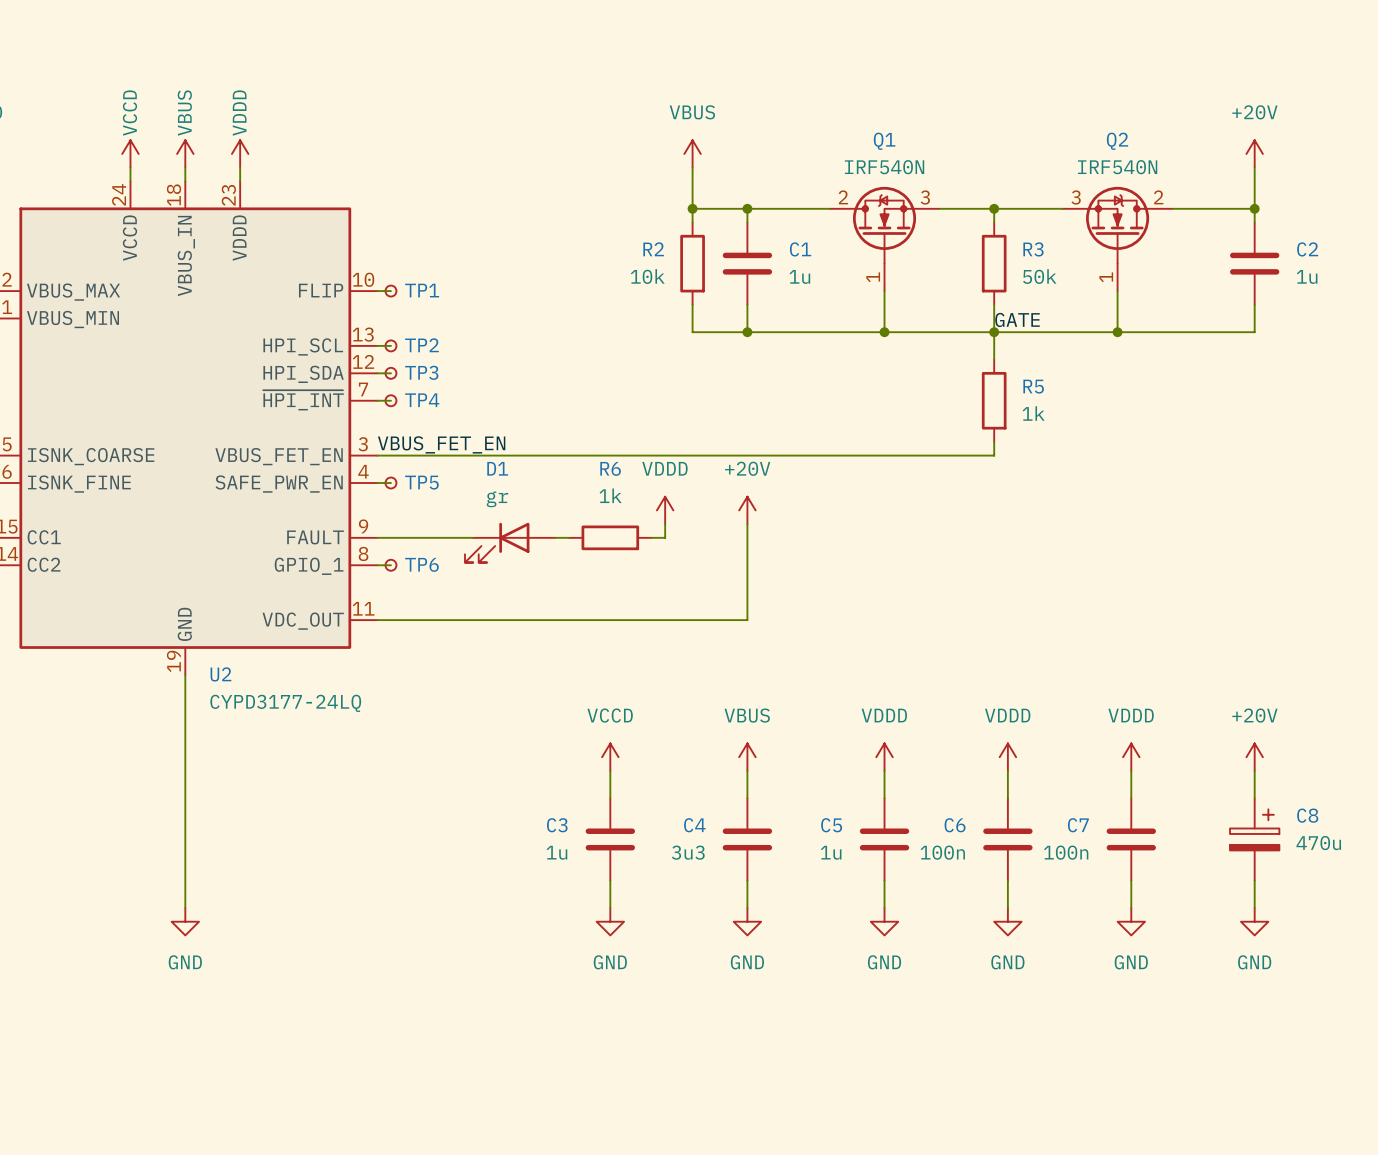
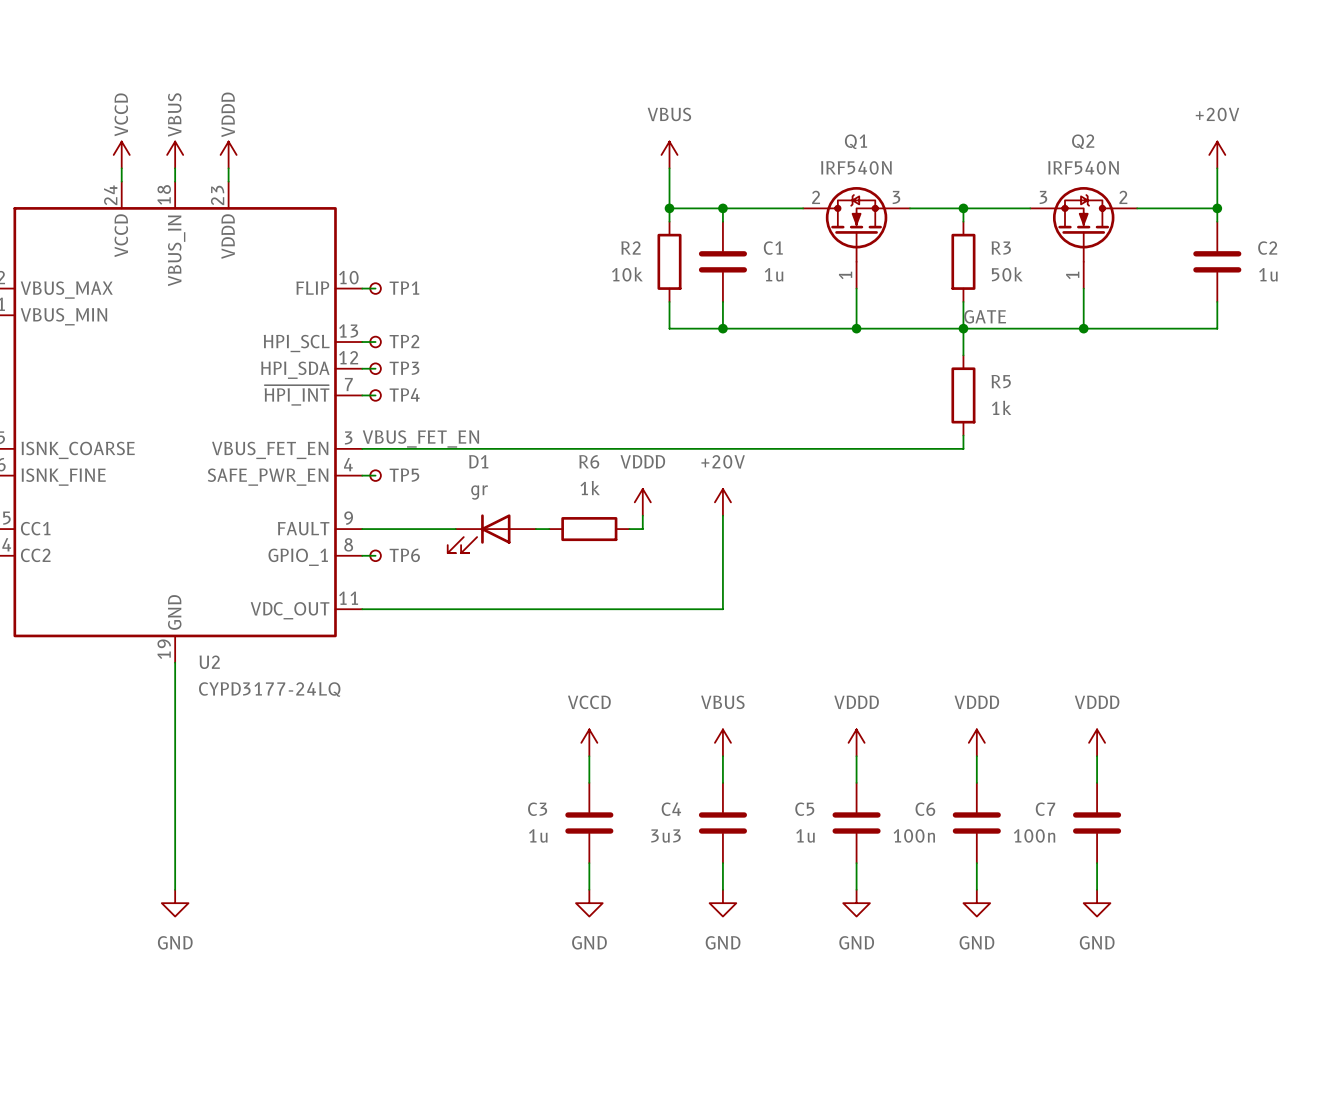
power symbol: +20V (1254, 757) -> none
wire: (1254, 770) (1254, 798) -> none
C8: 470u (1254, 839) -> none
wire: (1254, 880) (1254, 908) -> none
power symbol: GND (1254, 921) -> none

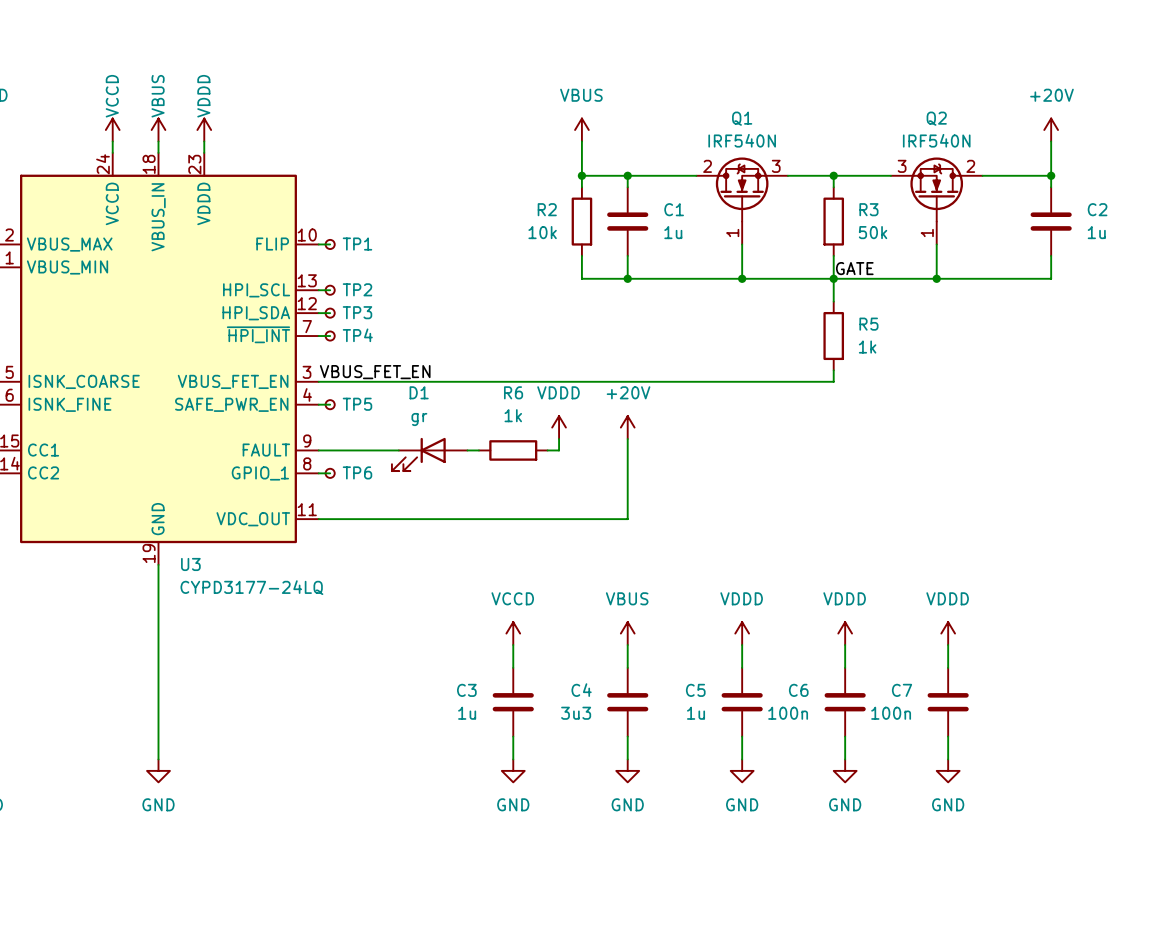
U2 name: U2 (209, 662) -> U3 (190, 564)

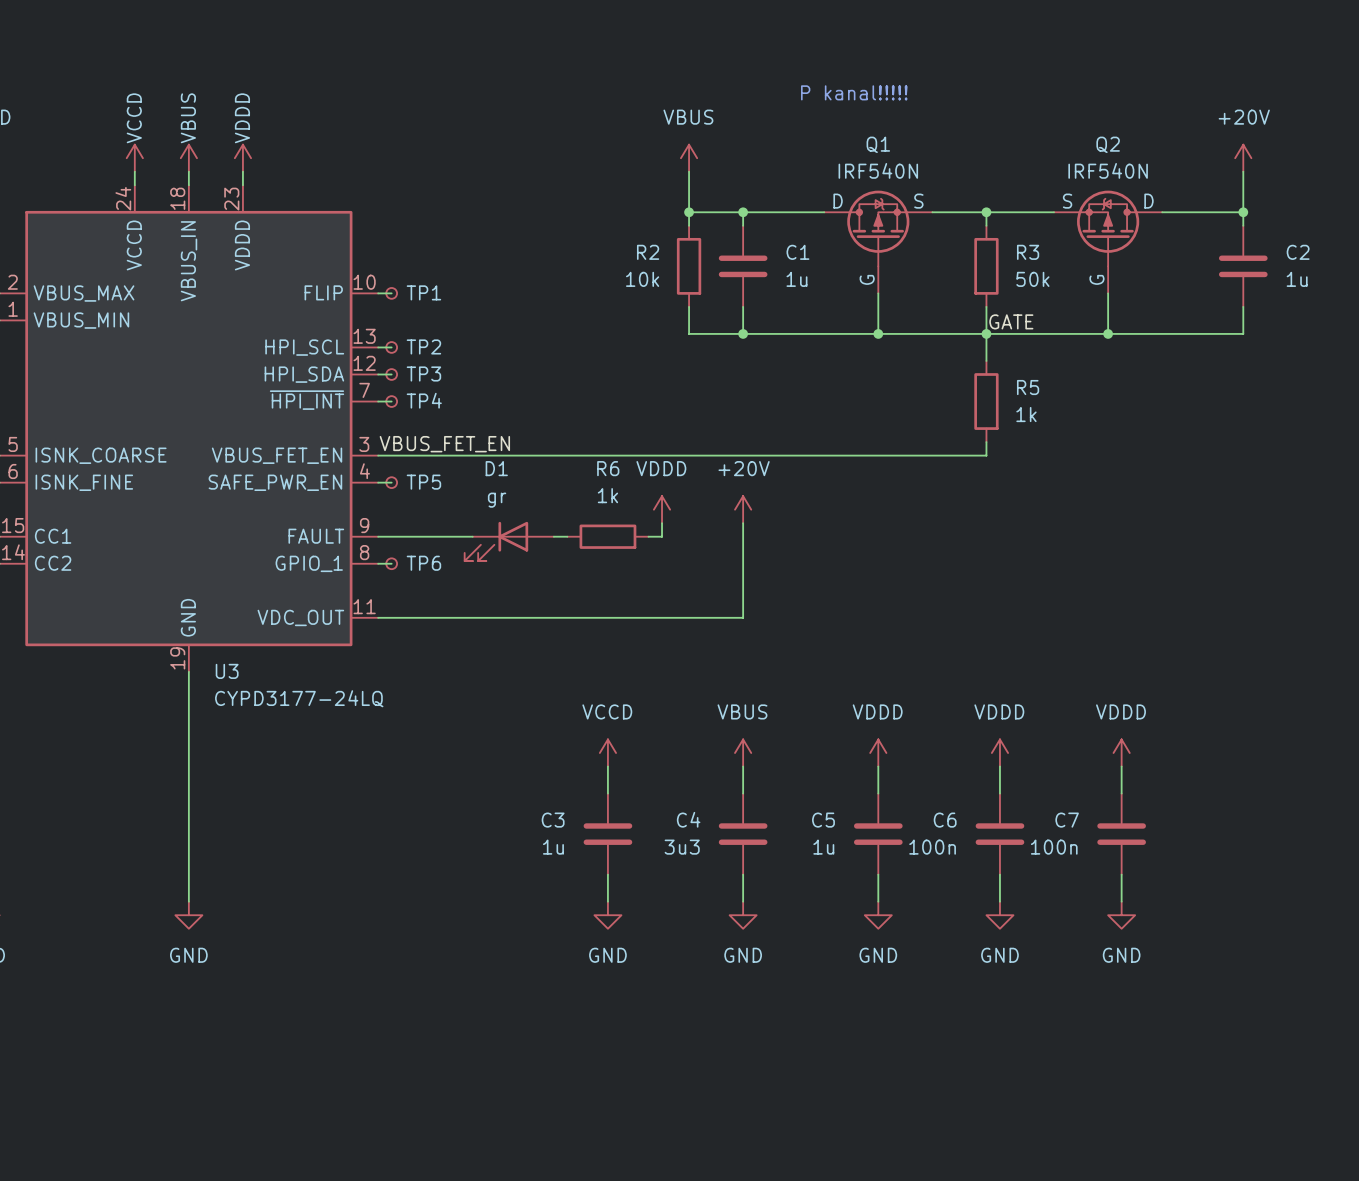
text: none -> P kanal!!!!! (854, 92)
Q1 symbol: [696, 157, 788, 245] -> [824, 190, 933, 294]
Q2 symbol: [890, 157, 983, 245] -> [1054, 190, 1163, 294]

